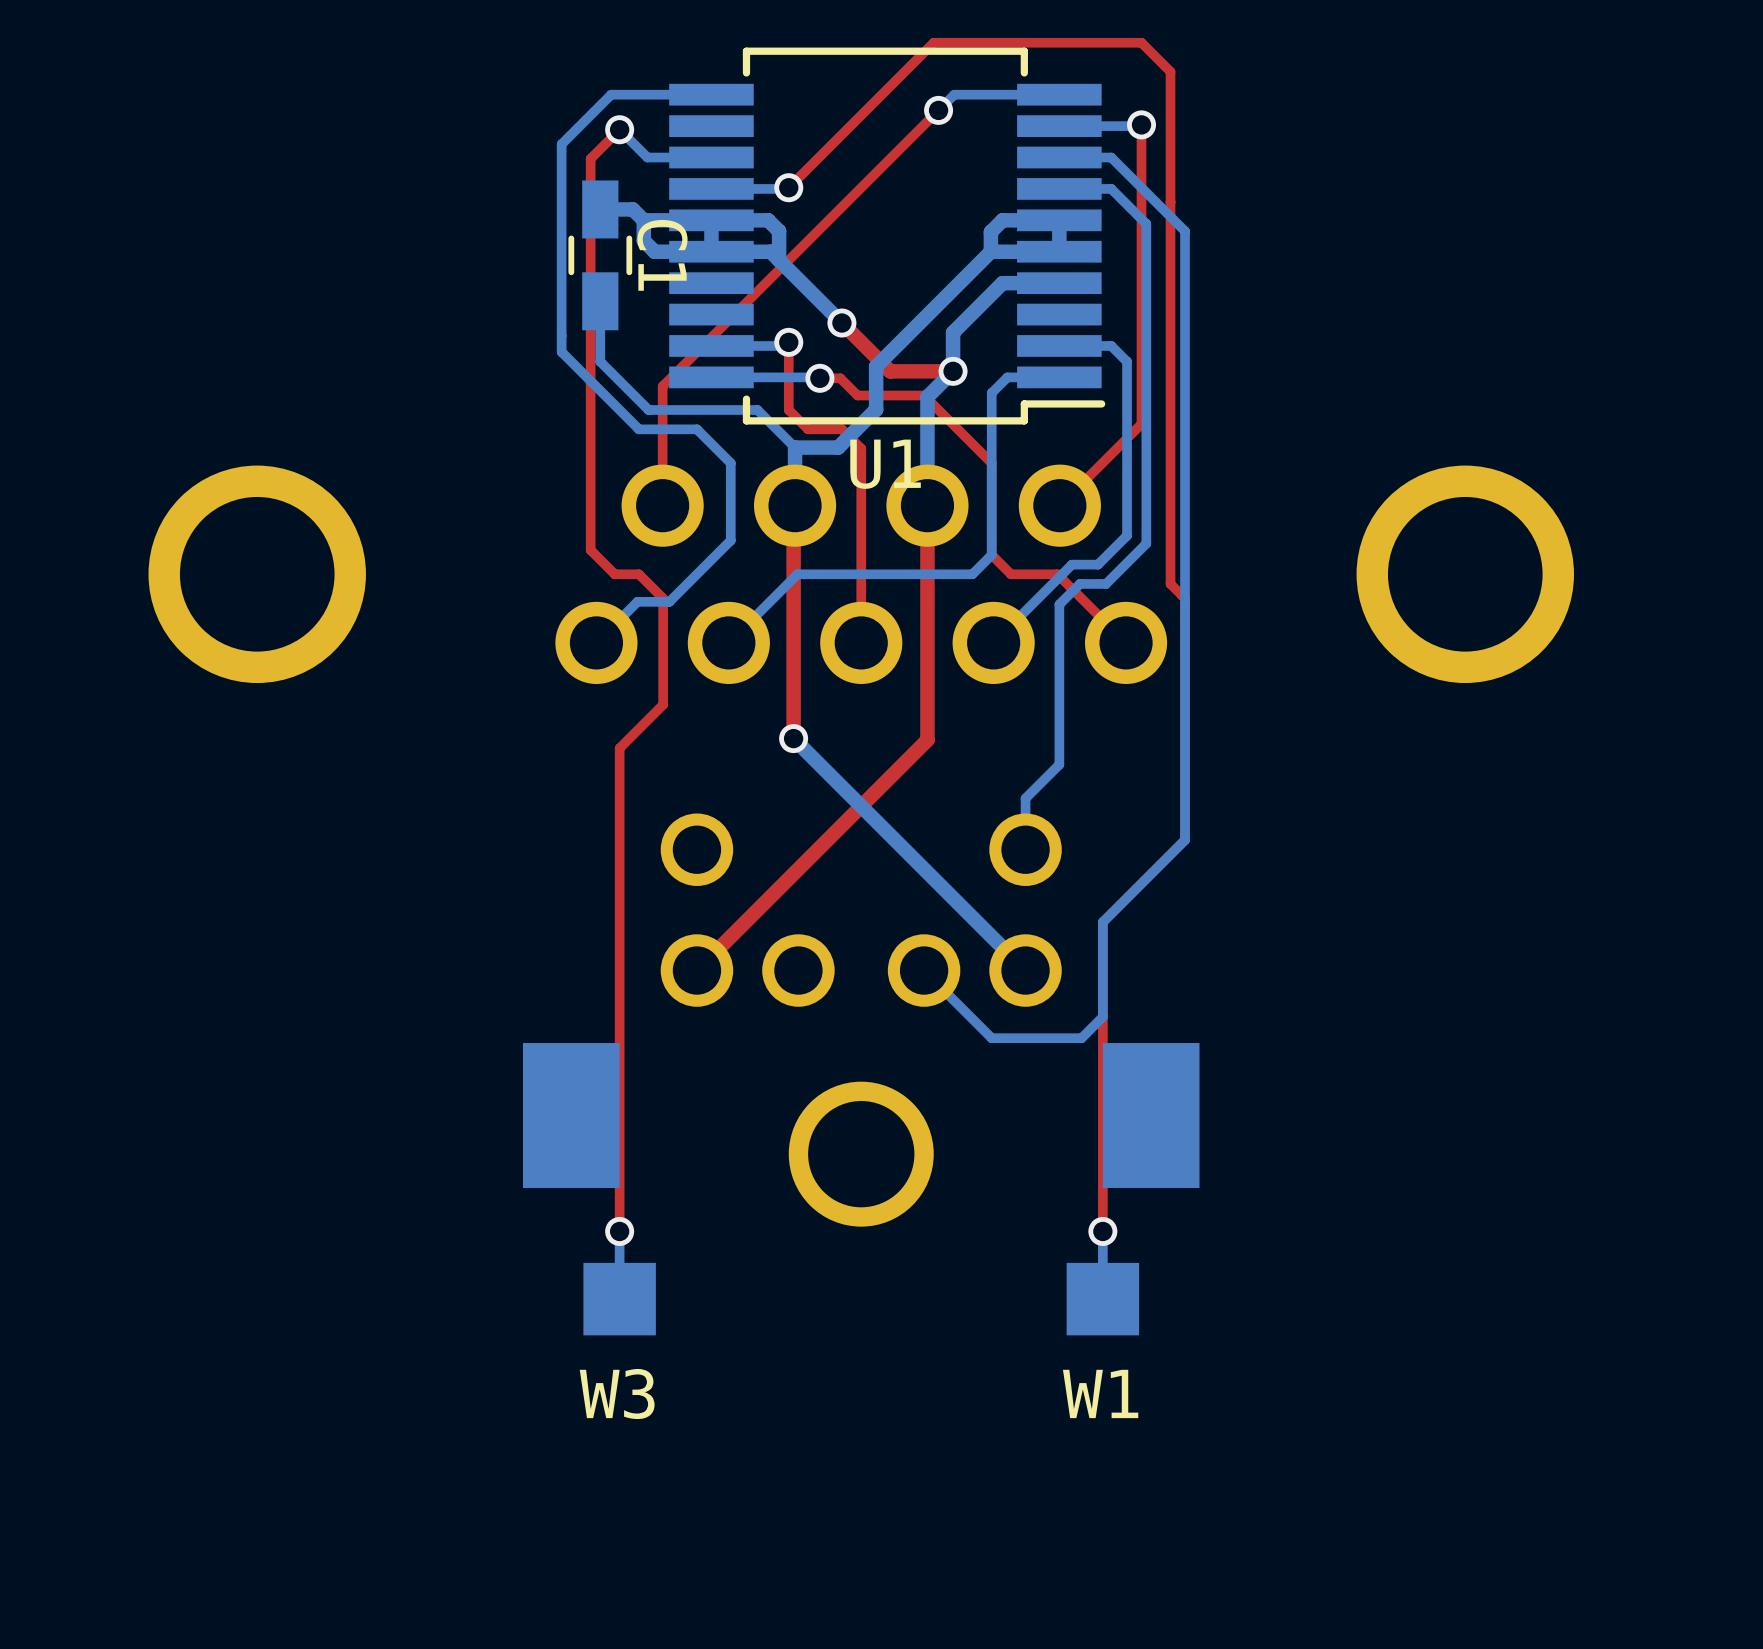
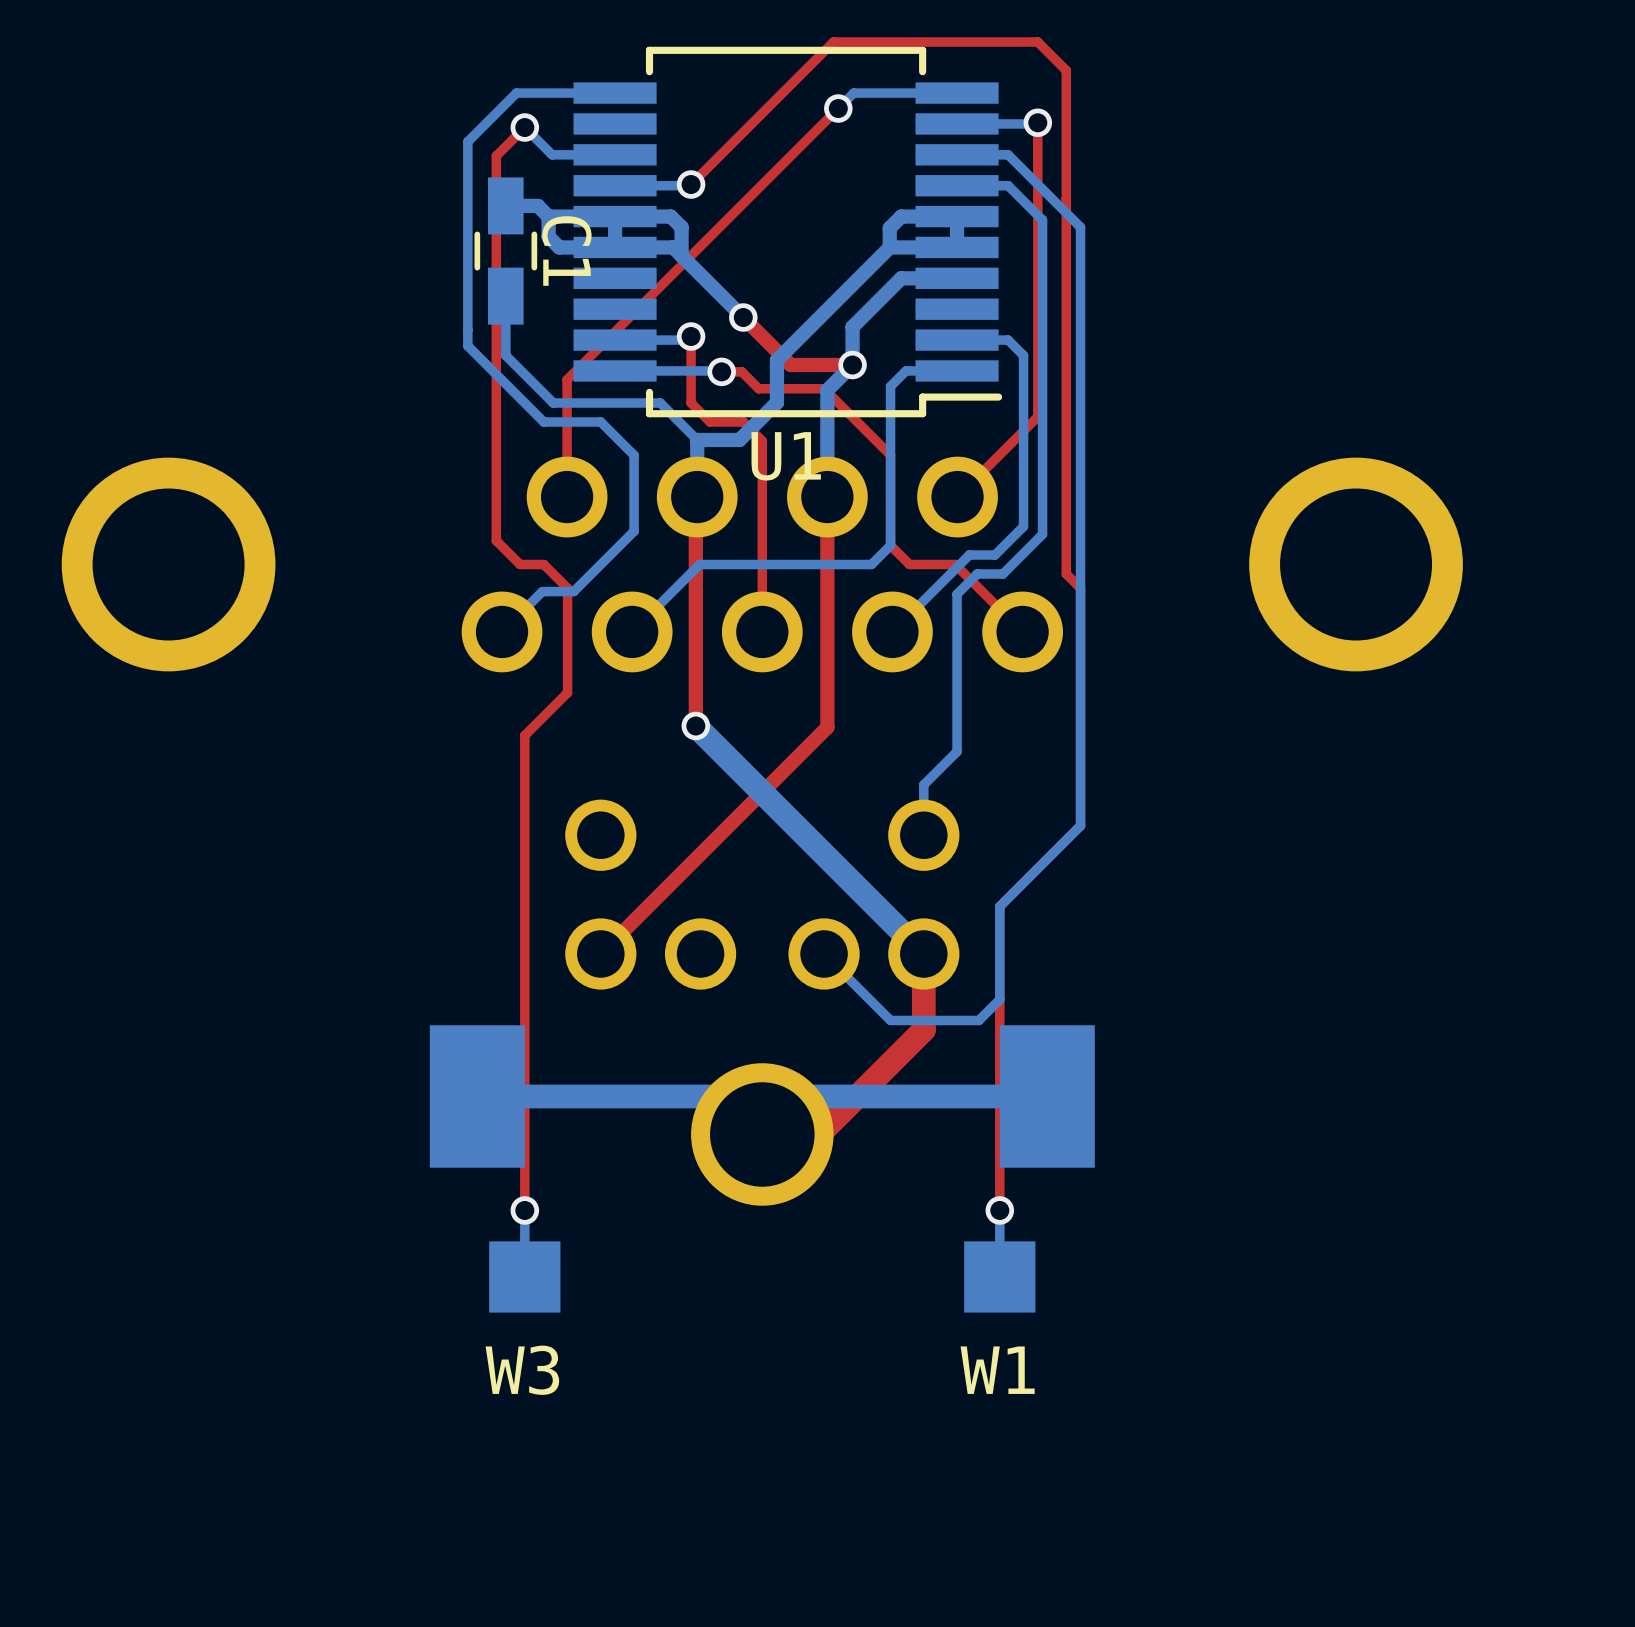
bottom track width: thin (793, 738) (1025, 970) -> thick (695, 726) (923, 953)
top track: none -> (923, 953) (923, 1029) (819, 1134) (762, 1134)
bottom track: none -> (1047, 1096) (800, 1096) (762, 1134) (724, 1096) (477, 1096)

